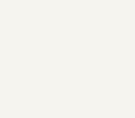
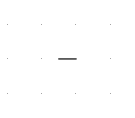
line: none -> (58, 58) (75, 58)

